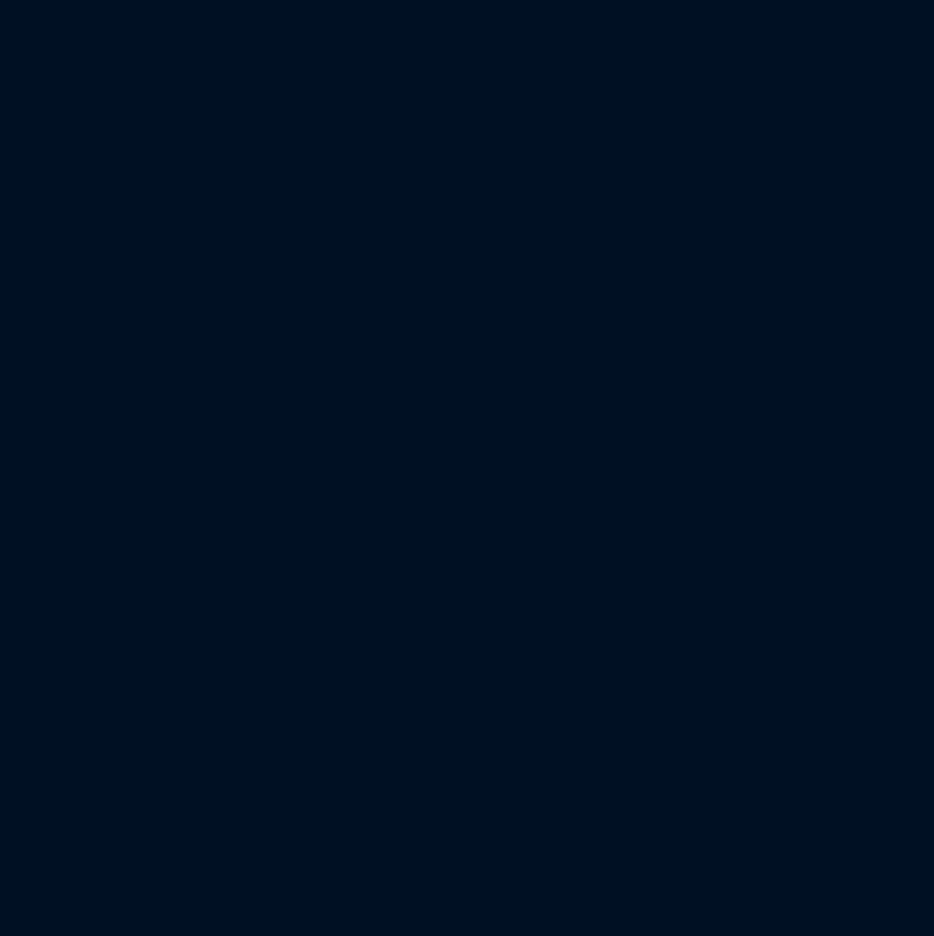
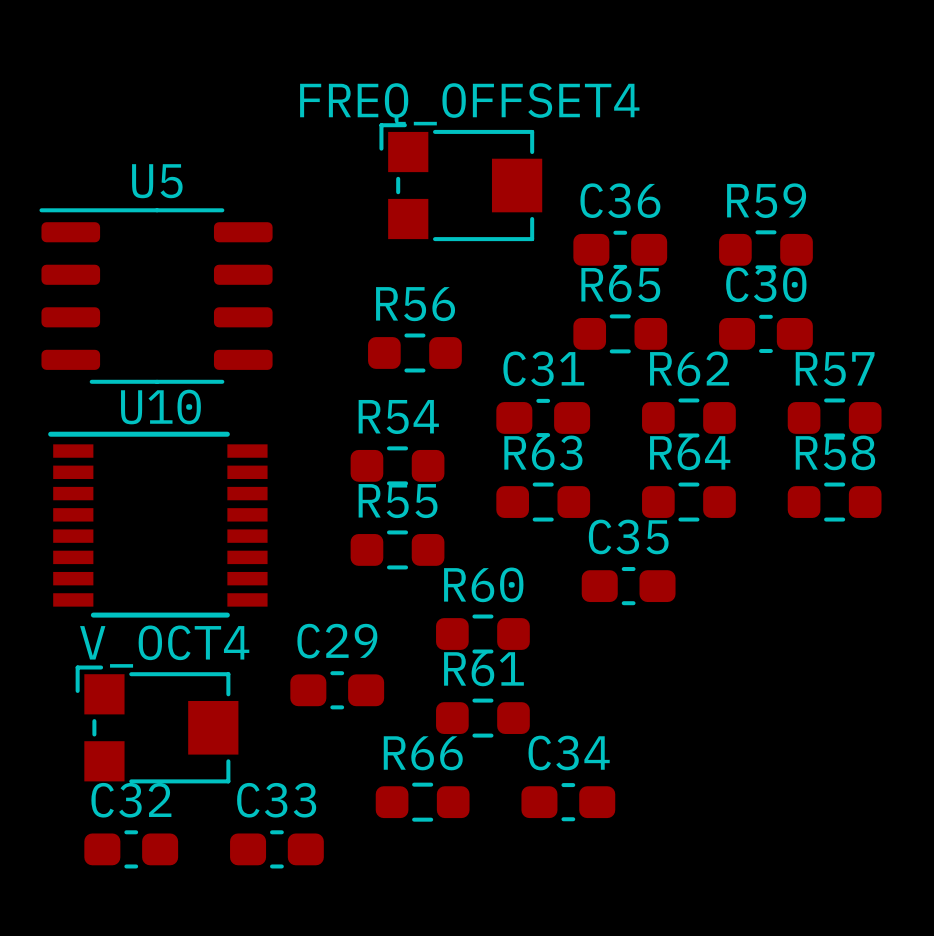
FREQ_OFFSET4: none -> (460, 182)
C36: none -> (620, 249)
R59: none -> (765, 249)
U5: none -> (156, 296)
R65: none -> (620, 333)
C30: none -> (765, 333)
R56: none -> (414, 352)
C31: none -> (543, 417)
R62: none -> (688, 417)
R57: none -> (834, 417)
R54: none -> (397, 465)
R63: none -> (543, 502)
R64: none -> (688, 502)
R58: none -> (834, 502)
U10: none -> (157, 524)
R55: none -> (397, 549)
C35: none -> (628, 586)
R60: none -> (482, 634)
C29: none -> (337, 690)
R61: none -> (482, 718)
V_OCT4: none -> (157, 724)
R66: none -> (422, 802)
C34: none -> (568, 802)
C32: none -> (131, 849)
C33: none -> (276, 849)

